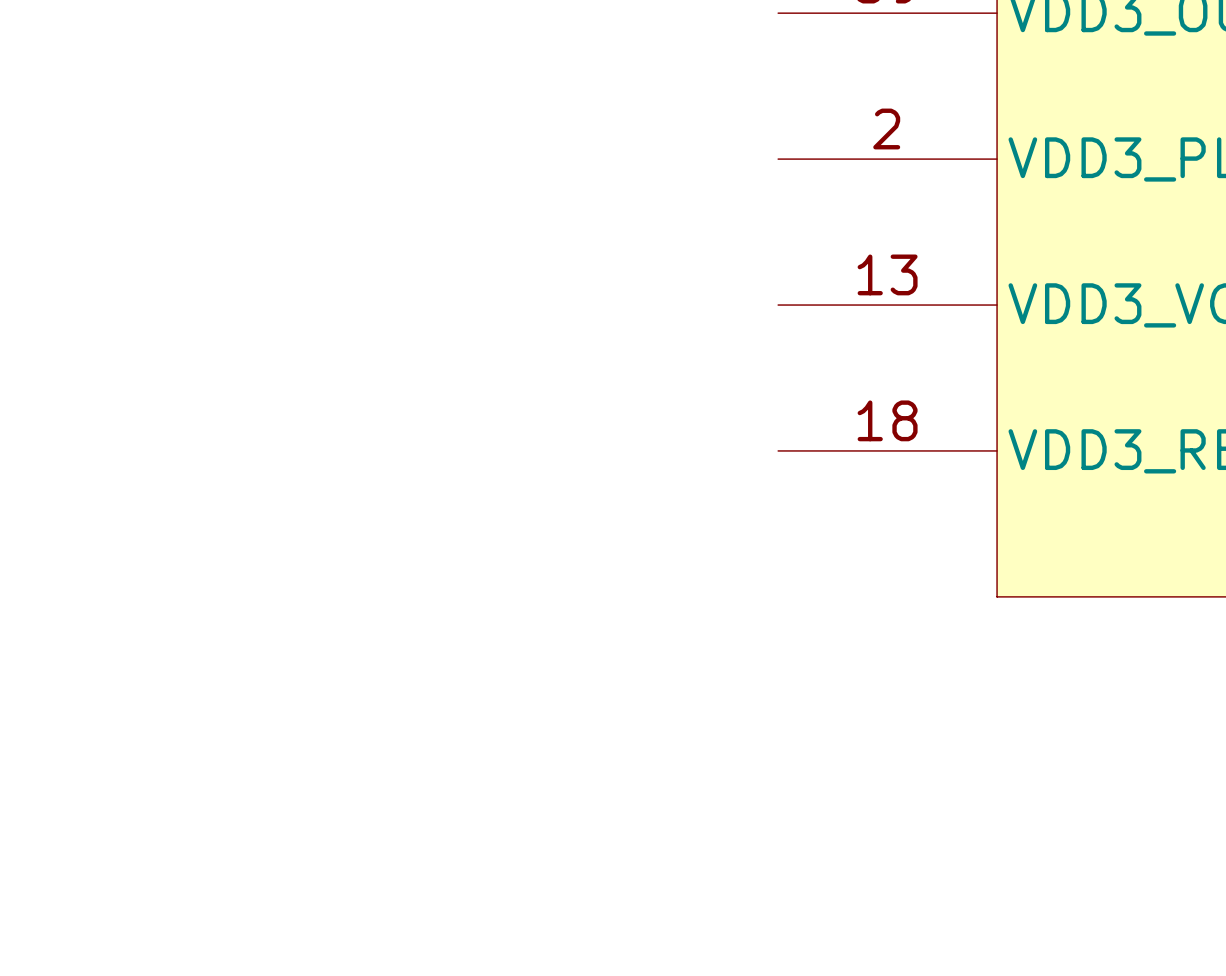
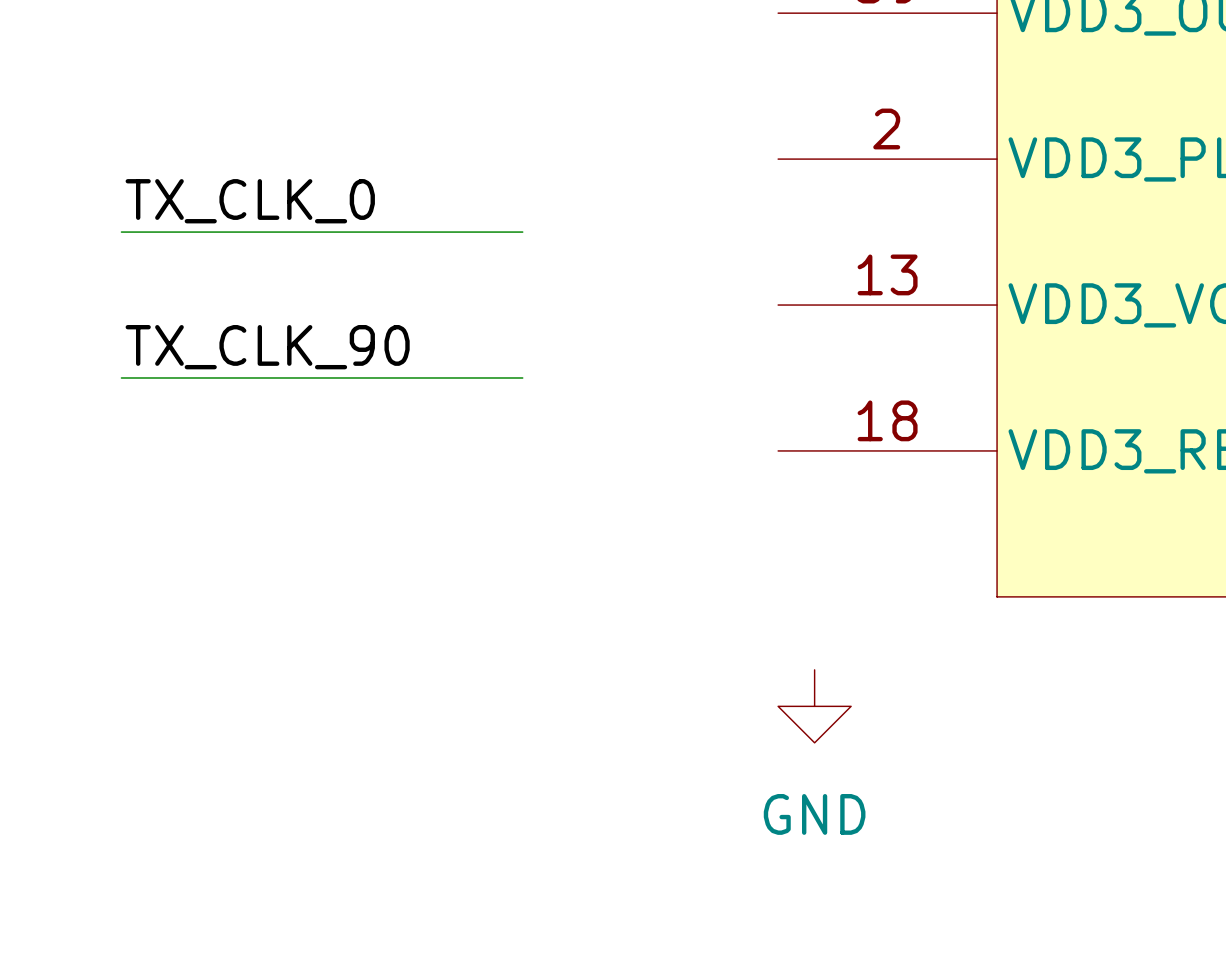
label: none -> TX_CLK_0 (250, 201)
wire: none -> (121, 232) (522, 232)
label: none -> TX_CLK_90 (267, 347)
wire: none -> (121, 377) (522, 377)
power symbol: none -> GND (814, 706)

